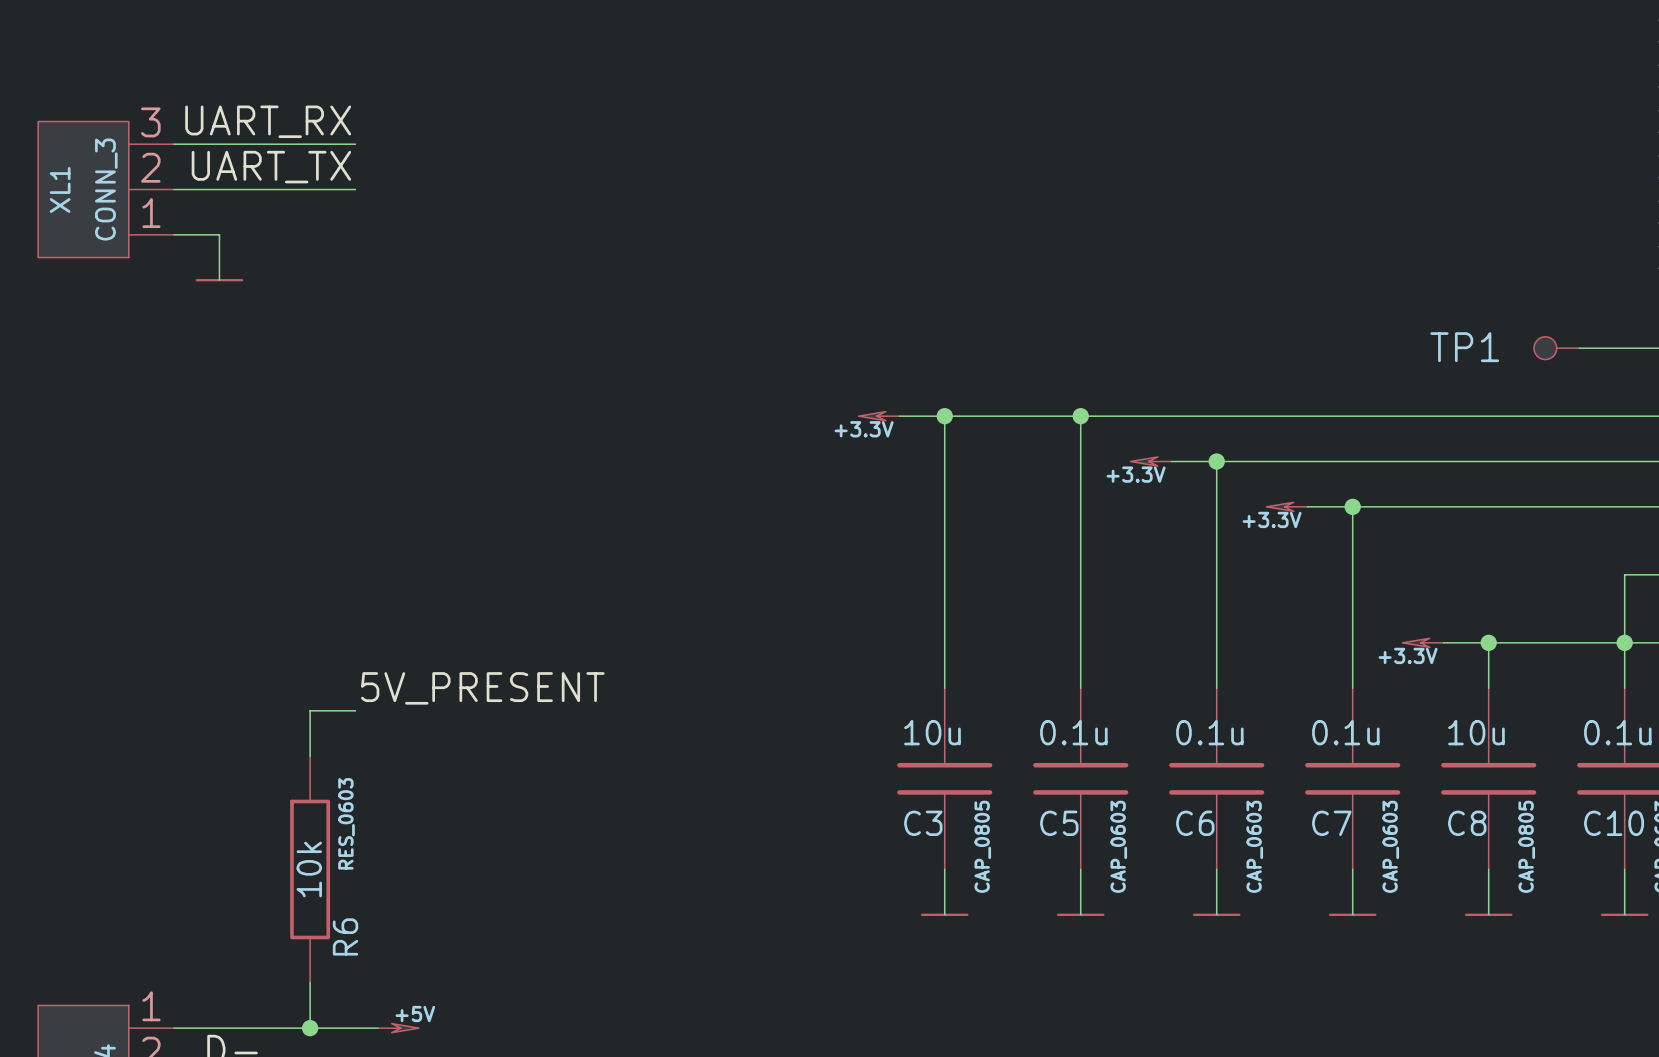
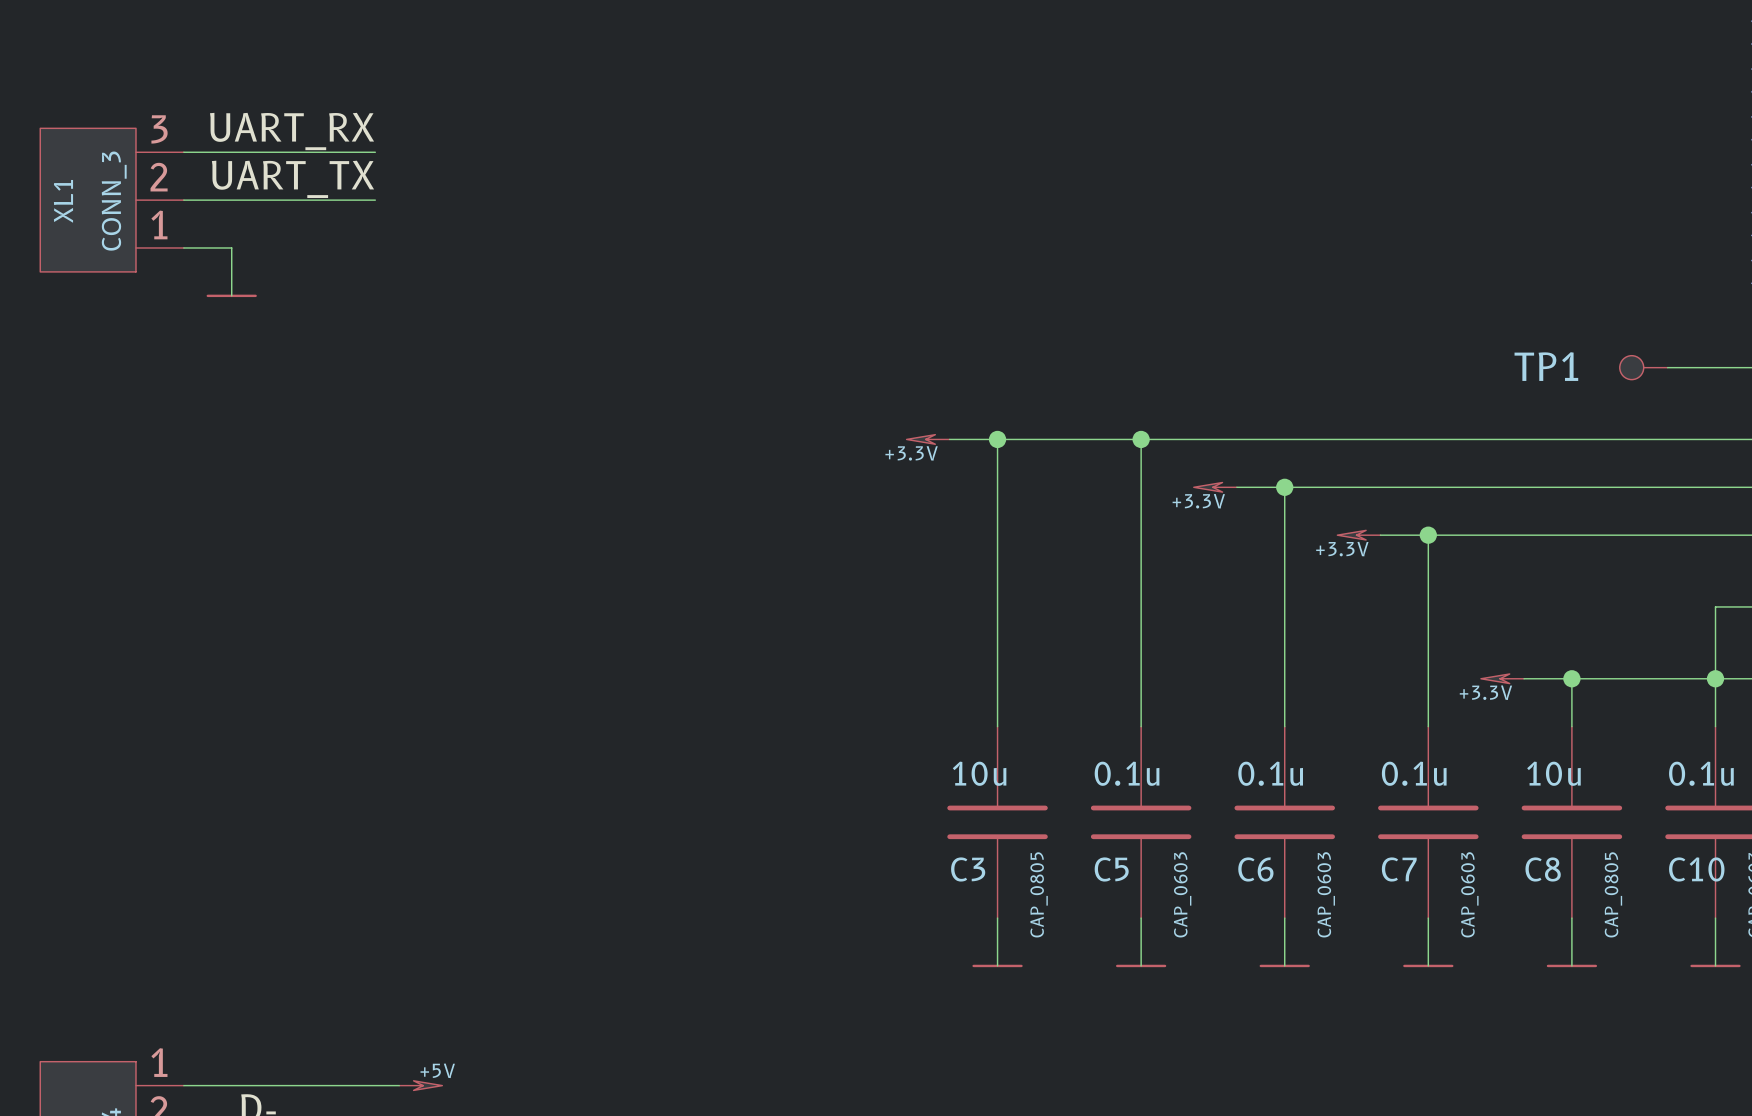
label: 5V_PRESENT (482, 688) -> none
wire: (355, 710) (310, 710) (310, 756) -> none
R6: 10k (310, 869) -> none
wire: (310, 982) (310, 1028) -> none
junction: (310, 1028) -> none

